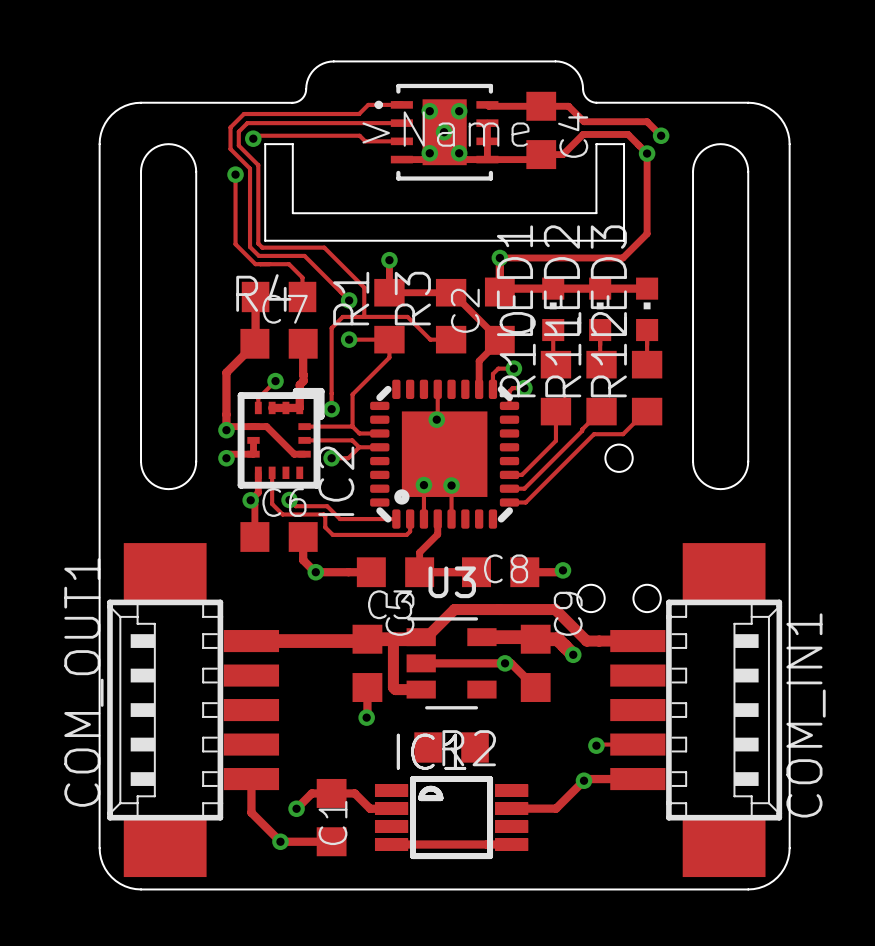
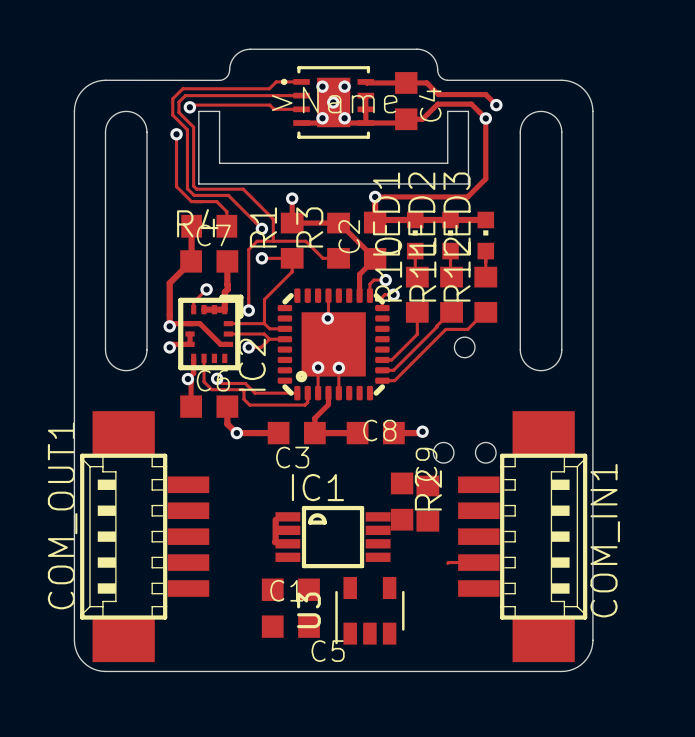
track: (481, 637) (557, 639) (573, 654) -> none
track: (393, 639) (393, 687) (395, 689) (421, 689) -> none
track: (251, 641) (419, 639) (426, 637) (454, 609) (555, 609) (586, 641) (637, 641) -> none
via: (573, 654) -> none
C5 rotation: 0° (367, 663) -> 90° clockwise (290, 626)
C5 position: (367, 663) -> (290, 626)
track: (421, 663) (511, 663) (535, 687) -> none
U3 rotation: 0° (451, 663) -> 90° counterclockwise (369, 610)
U3 position: (451, 663) -> (369, 610)
via: (505, 663) -> none
via: (366, 717) -> none
via: (596, 745) -> none
R2 rotation: 0° (451, 747) -> 90° clockwise (427, 503)
R2 position: (451, 747) -> (427, 503)
track: (251, 779) (251, 812) (280, 841) (331, 841) -> none
track: (637, 779) (585, 779) (556, 808) (511, 808) -> none
via: (584, 780) -> none
track: (296, 808) (311, 793) (354, 793) (370, 808) (391, 808) -> none
via: (296, 808) -> none
C1 rotation: 0° (331, 817) -> 90° clockwise (290, 589)
C1 position: (331, 817) -> (290, 589)
IC1 position: (451, 817) -> (333, 537)
via: (280, 841) -> none
track: (391, 844) (511, 844) -> none

